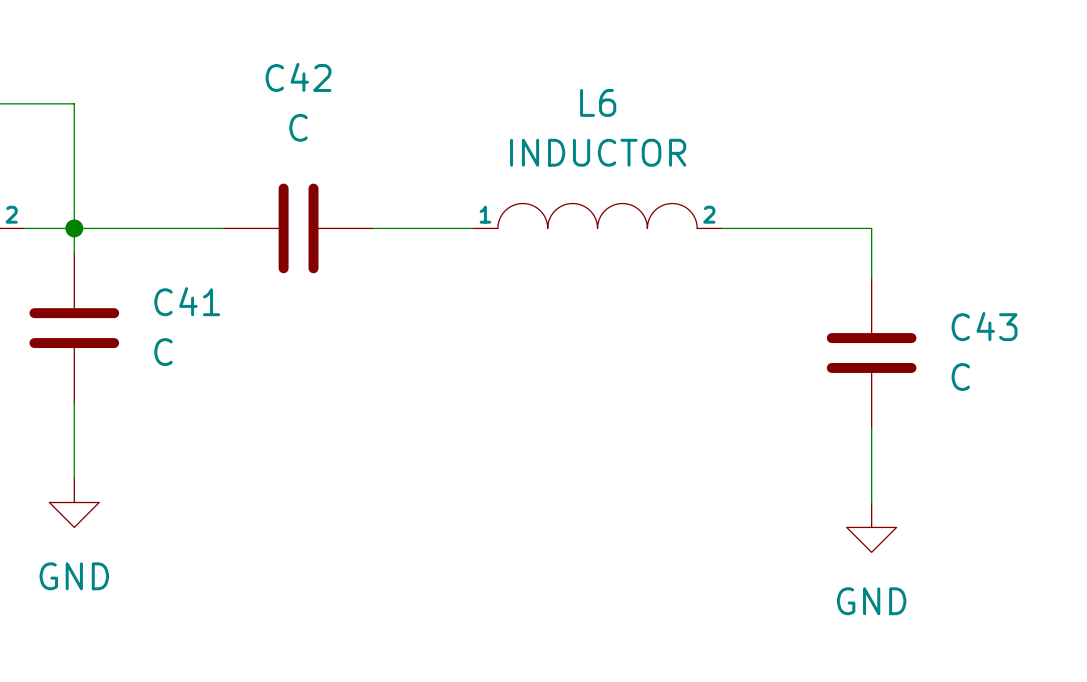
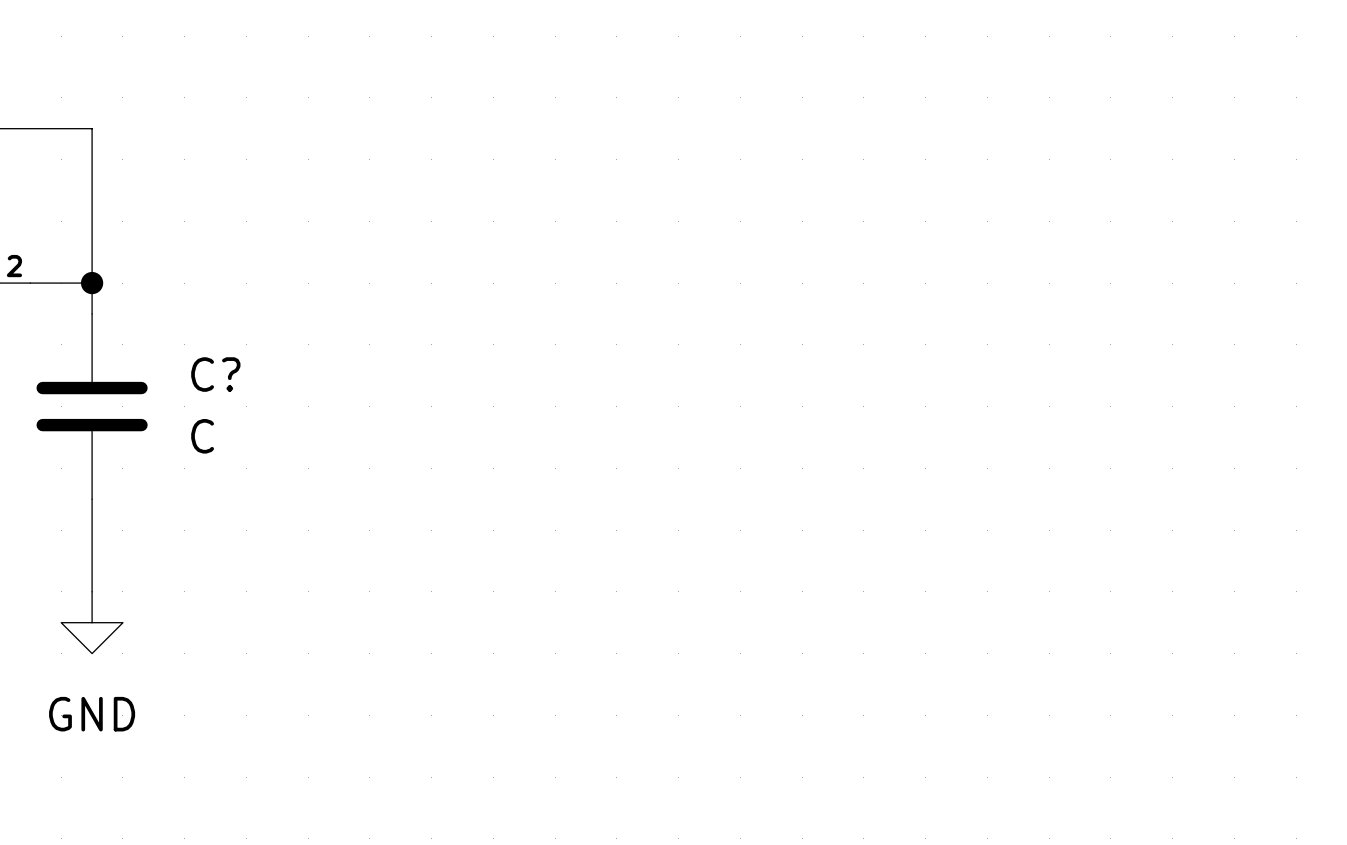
L6: INDUCTOR (597, 215) -> none
wire: (74, 228) (223, 228) -> none
C42: C (298, 228) -> none
wire: (373, 228) (472, 228) -> none
wire: (722, 228) (871, 228) (871, 278) -> none
C41 name: C41 (187, 301) -> C? (215, 374)
C43: C (871, 353) -> none
wire: (871, 427) (871, 502) -> none
power symbol: GND (871, 527) -> none

